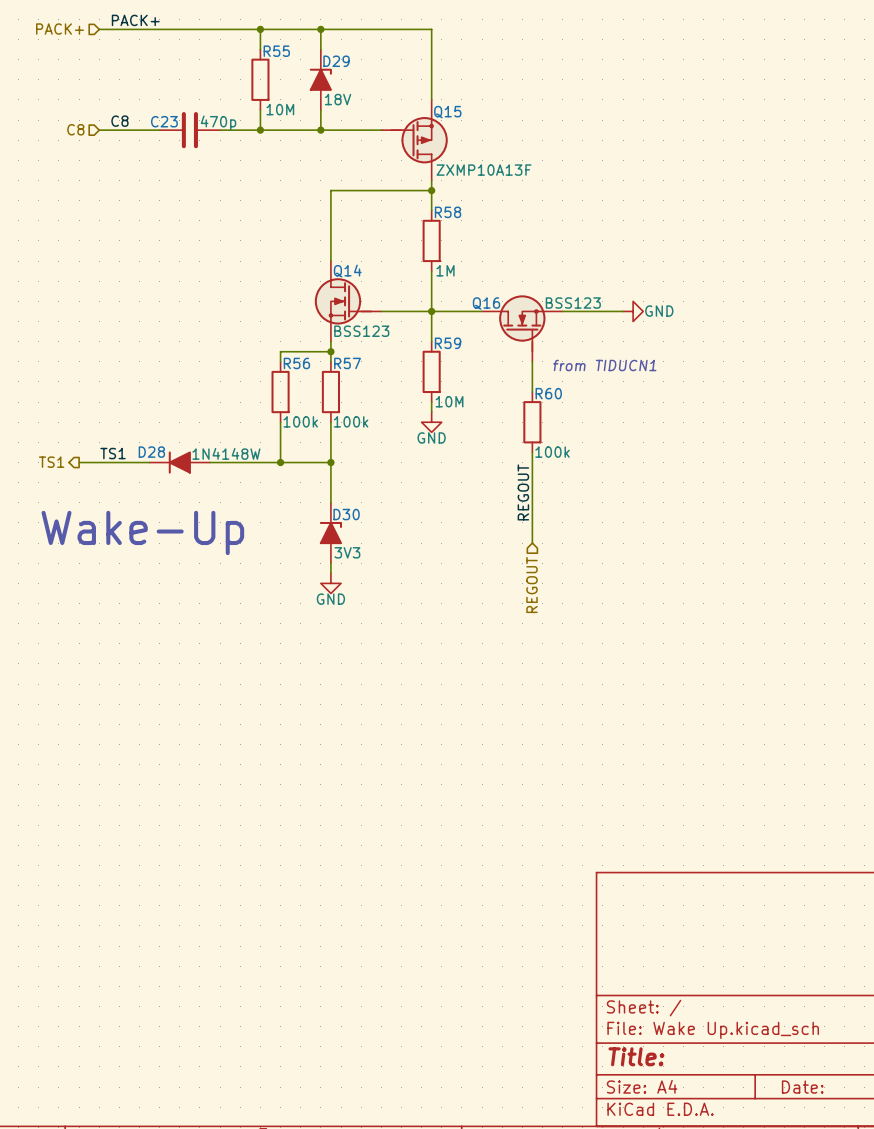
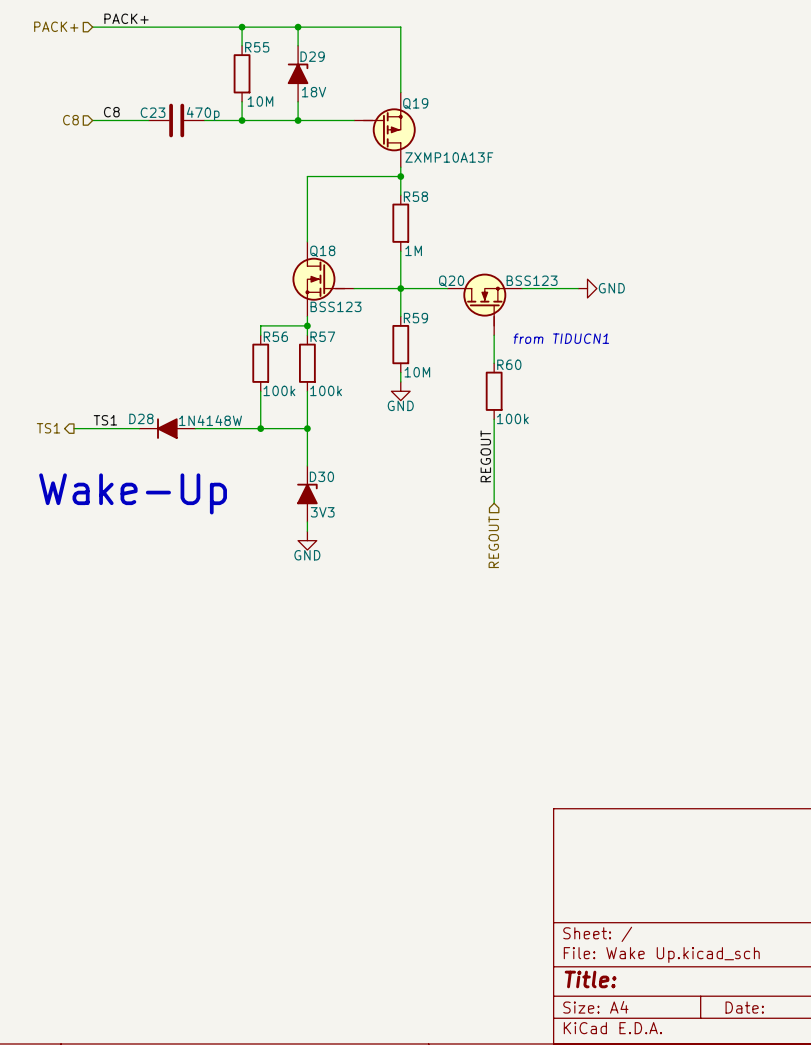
Q15 name: Q15 (447, 112) -> Q19 (415, 103)
Q14 name: Q14 (347, 271) -> Q18 (322, 251)
Q16 name: Q16 (486, 303) -> Q20 (451, 281)

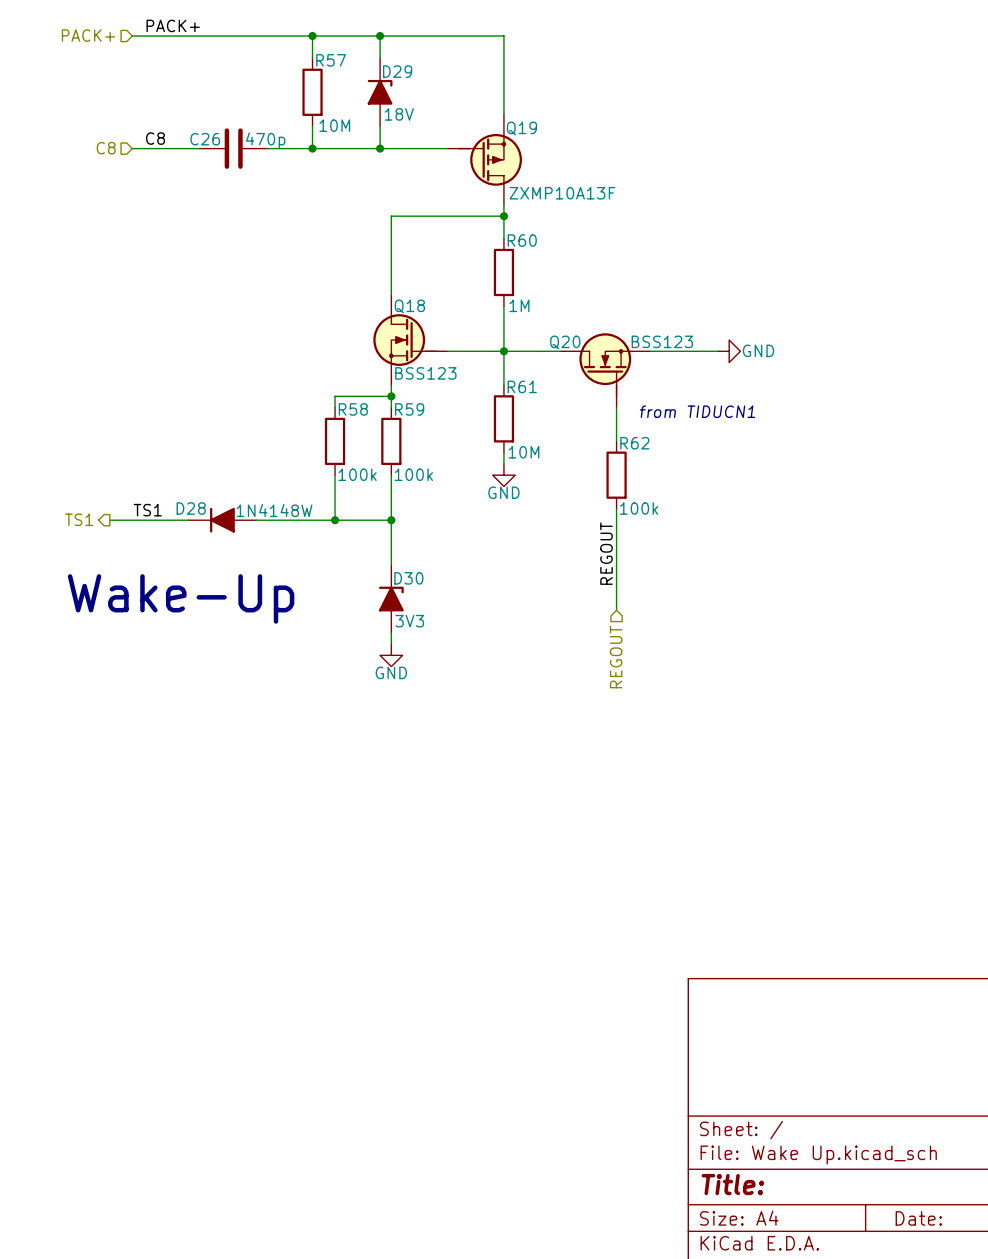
R55 name: R55 (257, 47) -> R57 (331, 60)
C23 name: C23 (153, 112) -> C26 (205, 139)
R58 name: R58 (415, 196) -> R60 (522, 240)
R59 name: R59 (415, 318) -> R61 (522, 386)
R56 name: R56 (275, 336) -> R58 (353, 409)
R57 name: R57 (322, 336) -> R59 (409, 409)
R60 name: R60 (509, 364) -> R62 (634, 443)

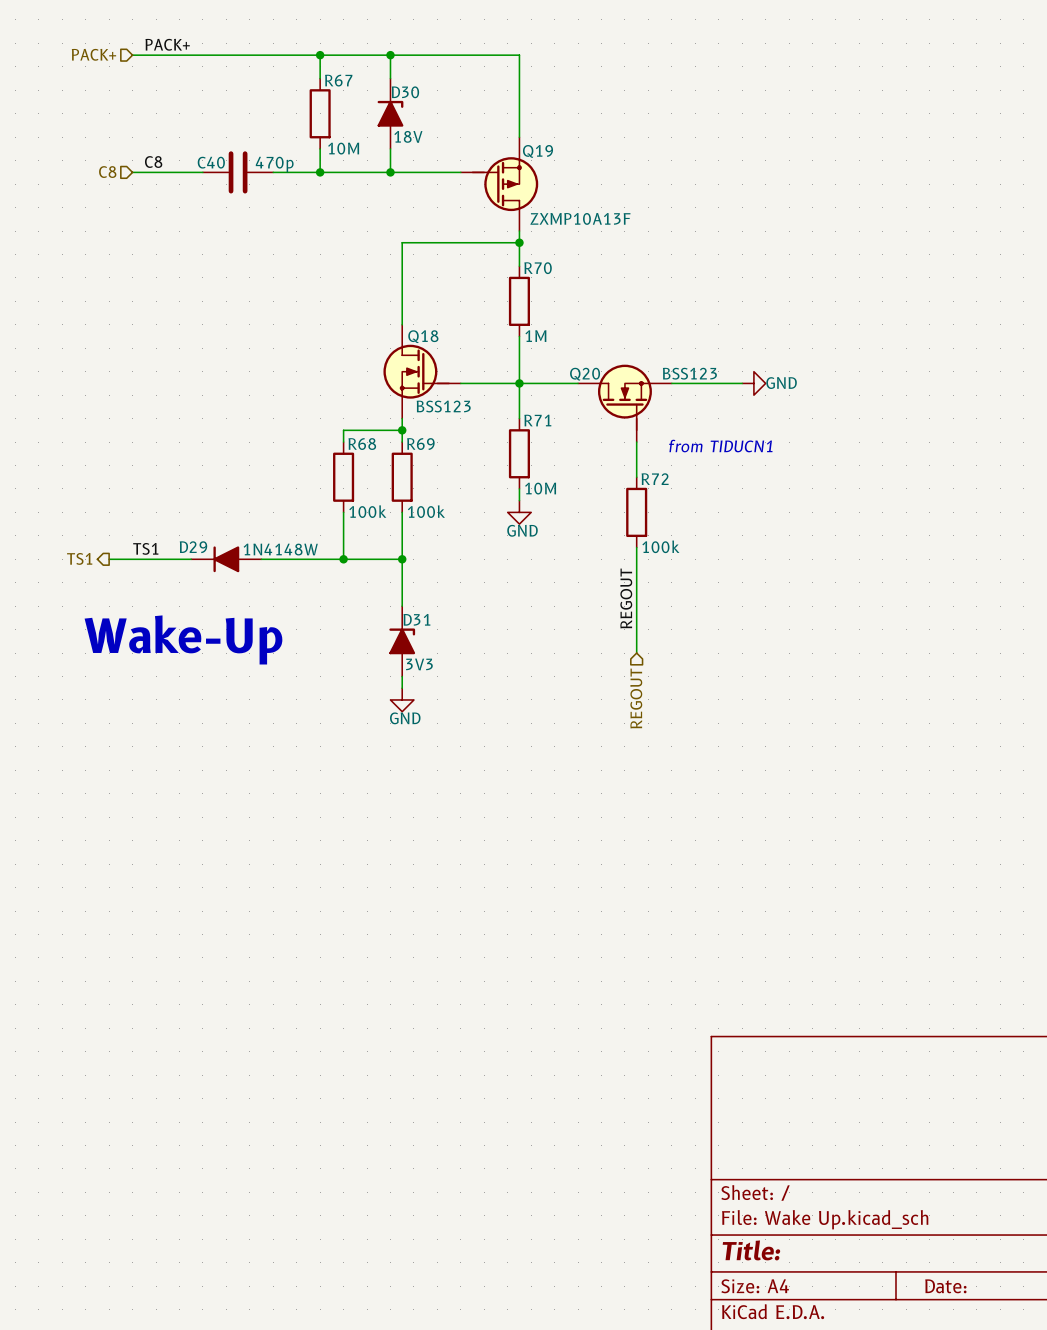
R57 name: R57 (331, 60) -> R67 (338, 80)
D29 name: D29 (397, 71) -> D30 (405, 92)
C26 name: C26 (205, 139) -> C40 (211, 162)
R60 name: R60 (522, 240) -> R70 (538, 268)
R61 name: R61 (522, 386) -> R71 (537, 420)
R58 name: R58 (353, 409) -> R68 (362, 444)
R59 name: R59 (409, 409) -> R69 (420, 444)
R62 name: R62 (634, 443) -> R72 (655, 479)
D28 name: D28 (191, 508) -> D29 (193, 547)
D30 name: D30 (408, 578) -> D31 (416, 619)

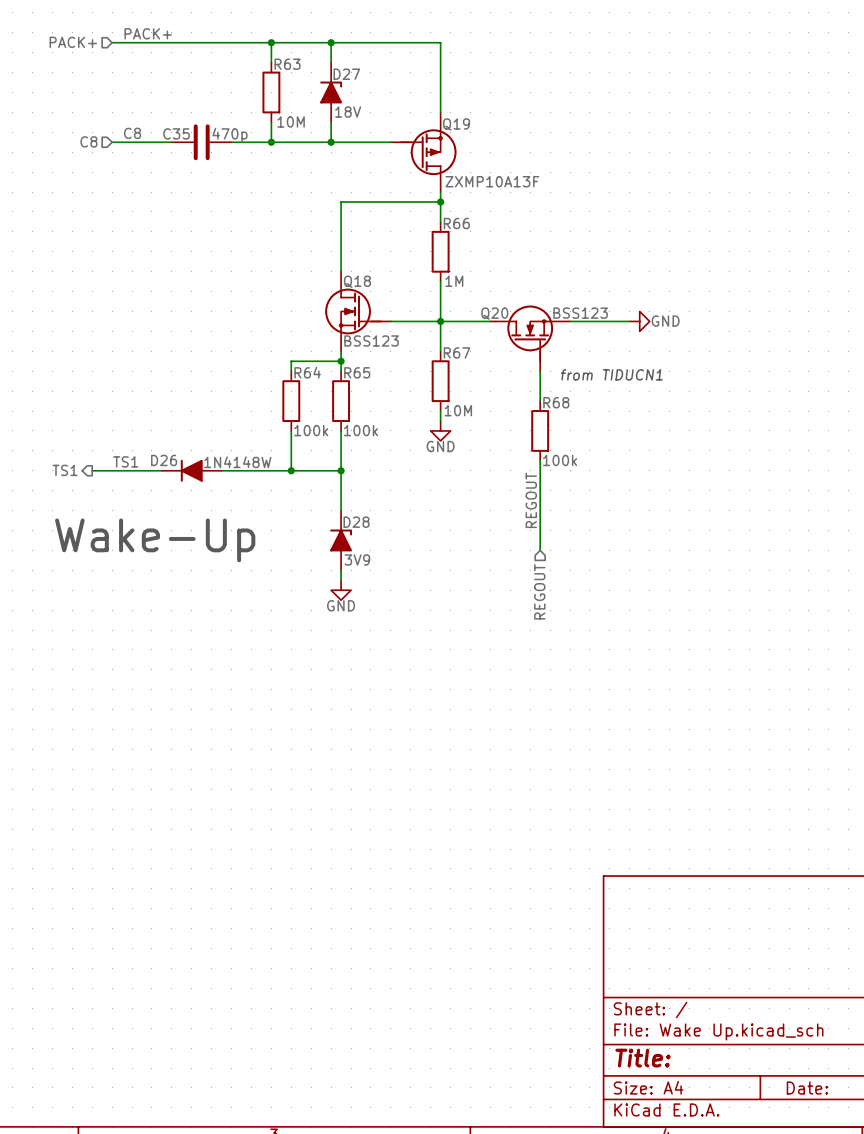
R67 name: R67 (338, 80) -> R63 (287, 64)
D30 name: D30 (405, 92) -> D27 (346, 74)
C40 name: C40 (211, 162) -> C35 (176, 133)
R70 name: R70 (538, 268) -> R66 (456, 223)
R71 name: R71 (537, 420) -> R67 (457, 352)
R68 name: R68 (362, 444) -> R64 (307, 372)
R69 name: R69 (420, 444) -> R65 (357, 372)
R72 name: R72 (655, 479) -> R68 (556, 402)
D29 name: D29 (193, 547) -> D26 (164, 460)
D31 name: D31 (416, 619) -> D28 (356, 522)
D31 value: 3V3 (419, 664) -> 3V9 (357, 560)

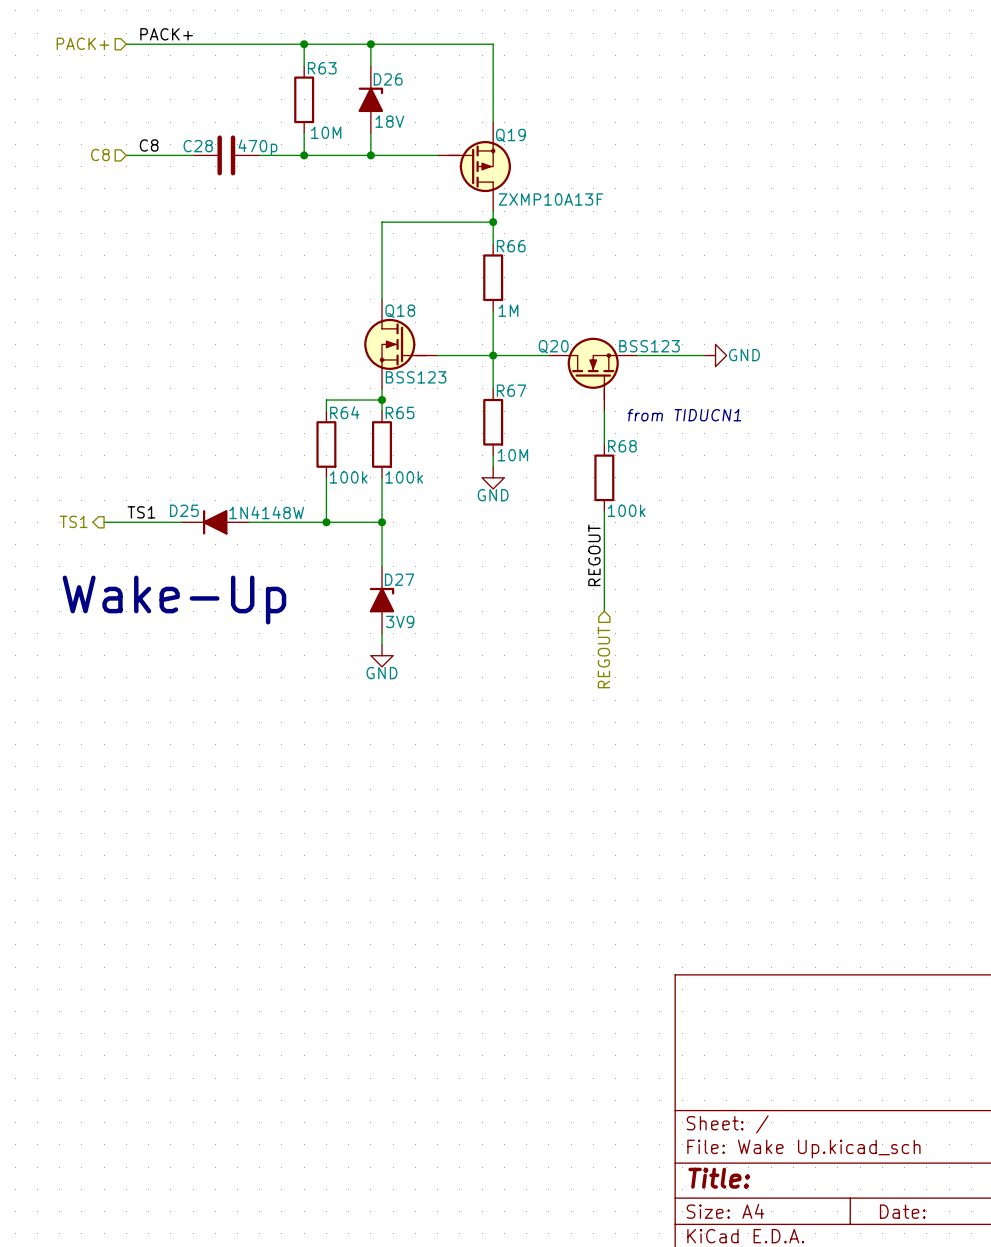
D27 name: D27 (346, 74) -> D26 (388, 79)
C35 name: C35 (176, 133) -> C28 (198, 146)
D26 name: D26 (164, 460) -> D25 (184, 510)
D28 name: D28 (356, 522) -> D27 (399, 579)

